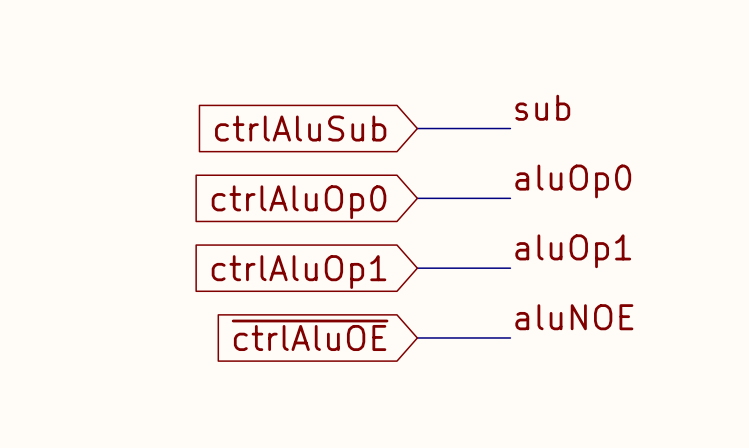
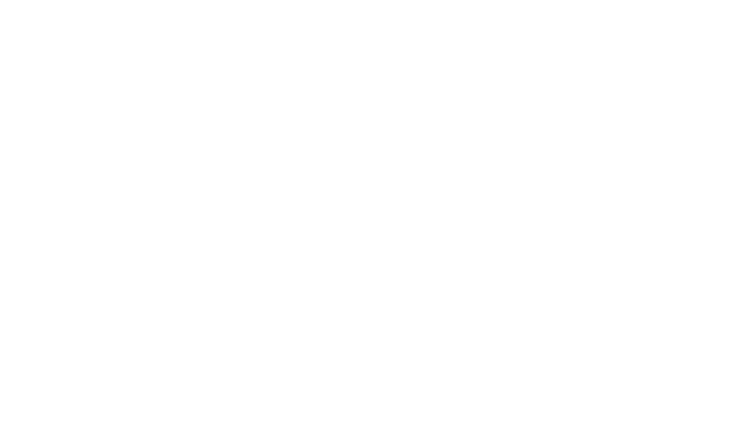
label: sub (542, 107) -> none
global label: ctrlAluSub (300, 128) -> none
wire: (417, 128) (510, 128) -> none
label: aluOp0 (573, 181) -> none
wire: (417, 198) (510, 198) -> none
global label: ctrlAluOp0 (299, 202) -> none
label: aluOp1 (573, 251) -> none
wire: (417, 268) (510, 268) -> none
global label: ctrlAluOp1 (299, 272) -> none
label: aluNOE (574, 317) -> none
global label: ~{ctrlAluOE} (310, 335) -> none
wire: (417, 337) (510, 337) -> none

